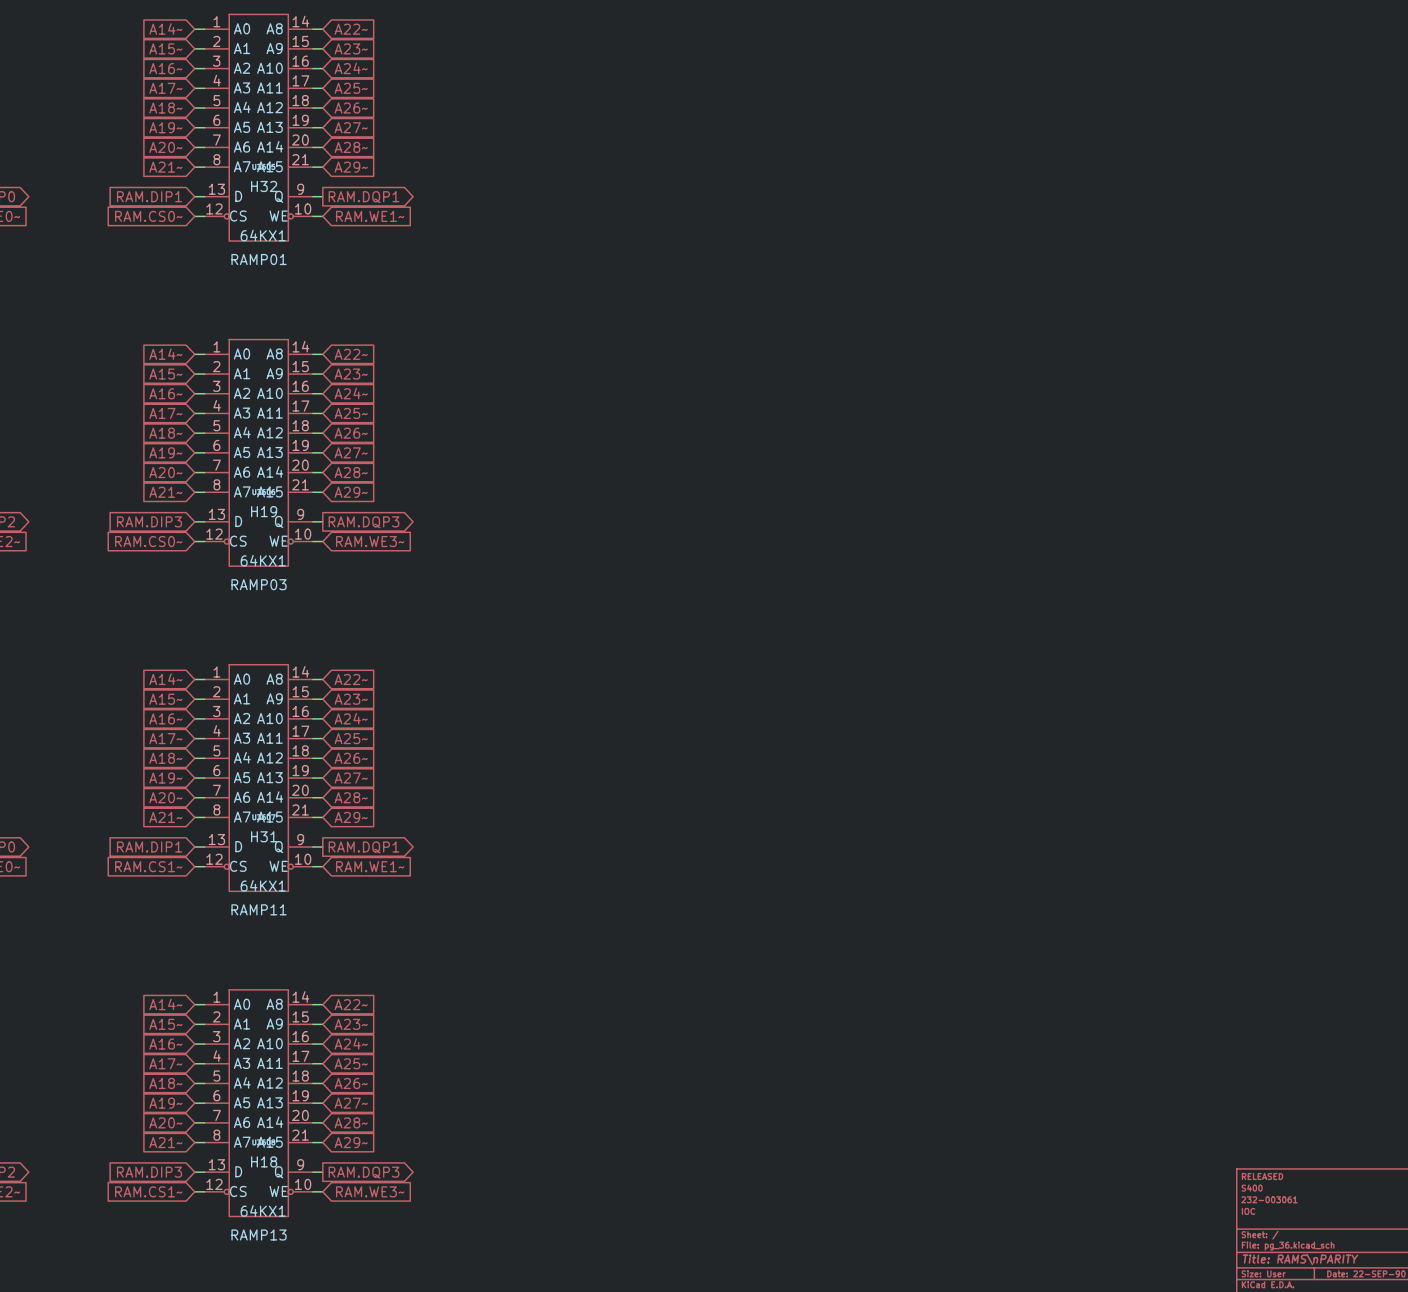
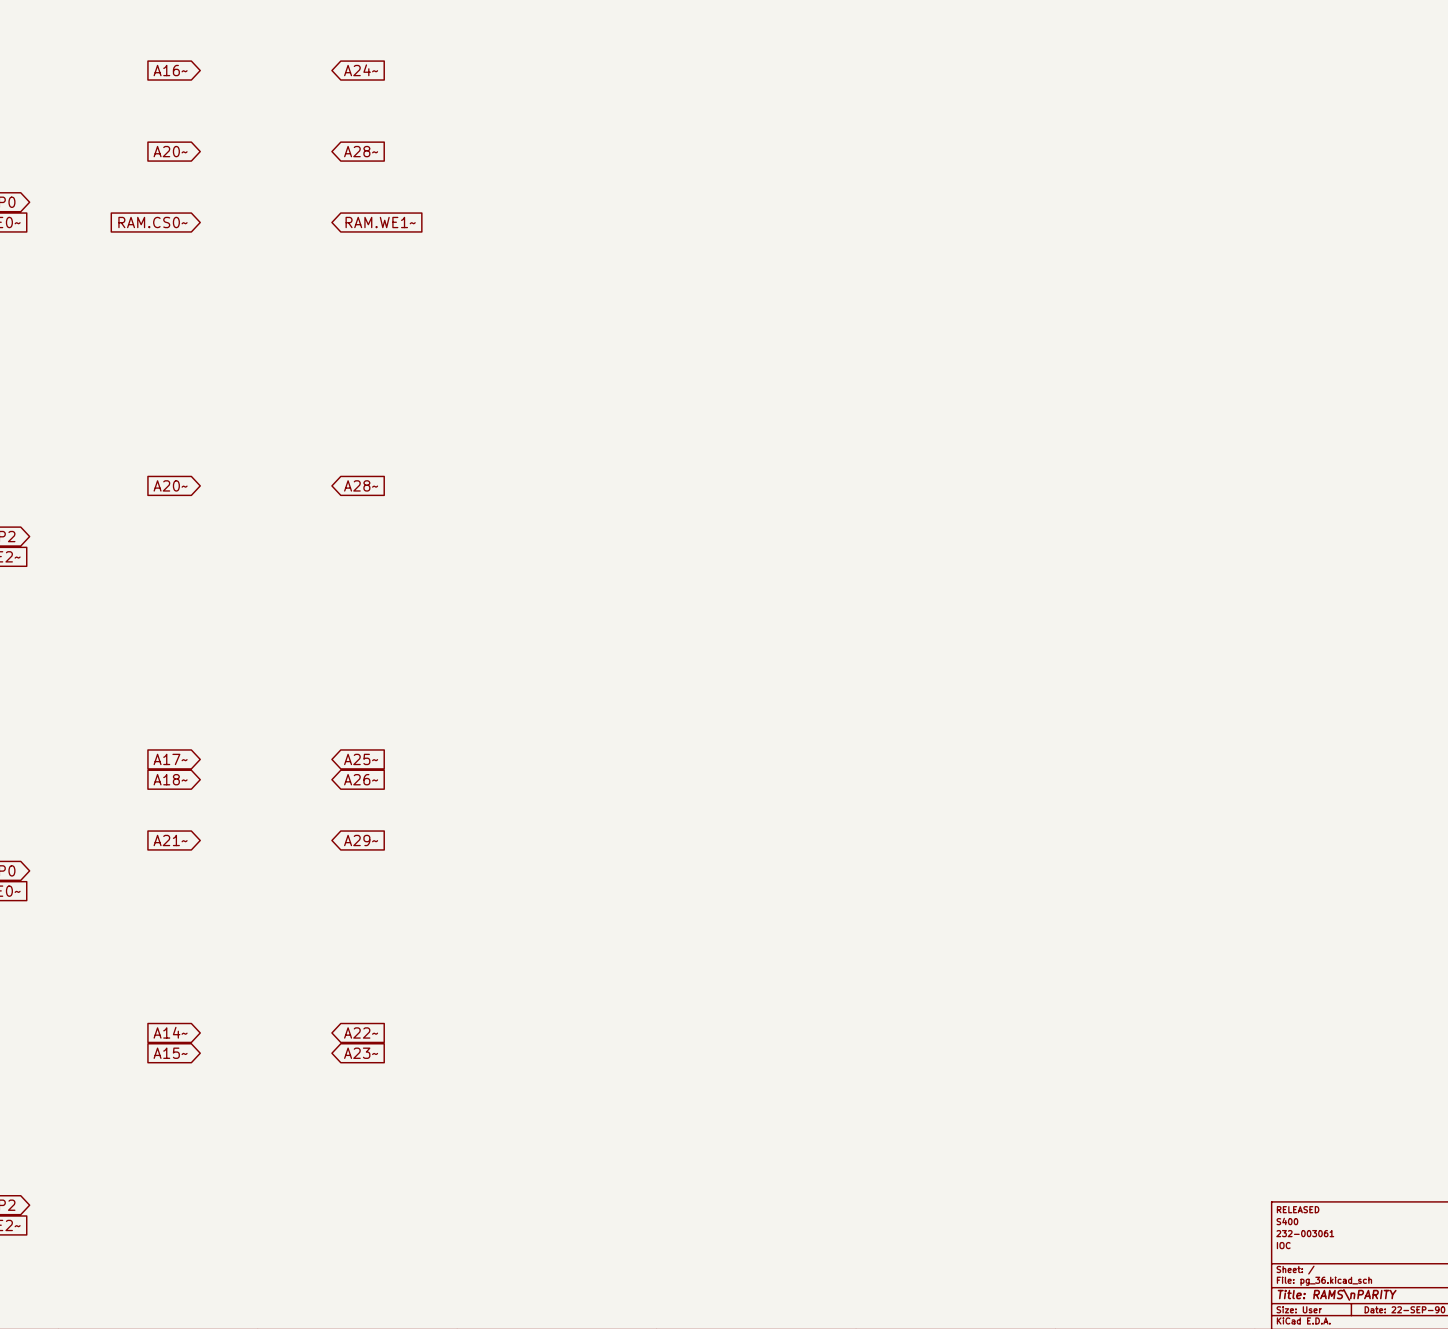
global label: A14~ (165, 28) -> none
wire: (194, 29) (204, 29) -> none
wire: (312, 29) (322, 29) -> none
global label: A22~ (351, 29) -> none
global label: A15~ (165, 48) -> none
wire: (194, 48) (204, 48) -> none
wire: (312, 48) (322, 48) -> none
global label: A23~ (351, 48) -> none
wire: (194, 68) (204, 68) -> none
wire: (312, 68) (322, 68) -> none
global label: A17~ (165, 88) -> none
wire: (194, 88) (204, 88) -> none
wire: (312, 88) (322, 88) -> none
global label: A25~ (351, 88) -> none
global label: A18~ (165, 108) -> none
wire: (194, 108) (204, 108) -> none
wire: (312, 108) (322, 108) -> none
global label: A26~ (351, 108) -> none
global label: A19~ (165, 127) -> none
wire: (194, 127) (204, 127) -> none
part: 64KX1 (258, 127) -> none
wire: (312, 127) (322, 127) -> none
global label: A27~ (351, 127) -> none
wire: (194, 147) (204, 147) -> none
wire: (312, 147) (322, 147) -> none
global label: A21~ (165, 167) -> none
wire: (194, 167) (204, 167) -> none
wire: (312, 167) (322, 167) -> none
global label: A29~ (351, 167) -> none
global label: RAM.DIP1 (149, 196) -> none
wire: (194, 196) (204, 196) -> none
wire: (312, 196) (322, 196) -> none
global label: RAM.DQP1 (363, 197) -> none
wire: (194, 216) (204, 216) -> none
wire: (312, 216) (322, 216) -> none
global label: A14~ (165, 354) -> none
wire: (194, 354) (204, 354) -> none
wire: (312, 354) (322, 354) -> none
global label: A22~ (351, 354) -> none
global label: A15~ (165, 374) -> none
wire: (194, 374) (204, 374) -> none
wire: (312, 374) (322, 374) -> none
global label: A23~ (351, 374) -> none
global label: A16~ (165, 393) -> none
wire: (194, 393) (204, 393) -> none
wire: (312, 393) (322, 393) -> none
global label: A24~ (351, 393) -> none
global label: A17~ (165, 413) -> none
wire: (194, 413) (204, 413) -> none
wire: (312, 413) (322, 413) -> none
global label: A25~ (351, 413) -> none
global label: A18~ (165, 433) -> none
wire: (194, 433) (204, 433) -> none
wire: (312, 433) (322, 433) -> none
global label: A26~ (351, 433) -> none
global label: A19~ (165, 452) -> none
wire: (194, 452) (204, 452) -> none
part: 64KX1 (258, 452) -> none
wire: (312, 452) (322, 452) -> none
global label: A27~ (351, 452) -> none
wire: (194, 472) (204, 472) -> none
wire: (312, 472) (322, 472) -> none
global label: A21~ (165, 492) -> none
wire: (194, 492) (204, 492) -> none
wire: (312, 492) (322, 492) -> none
global label: A29~ (351, 492) -> none
global label: RAM.DIP3 (149, 521) -> none
wire: (194, 521) (204, 521) -> none
wire: (312, 521) (322, 521) -> none
global label: RAM.DQP3 (363, 522) -> none
global label: RAM.CS0~ (148, 541) -> none
wire: (194, 541) (204, 541) -> none
wire: (312, 541) (322, 541) -> none
global label: RAM.WE3~ (370, 541) -> none
global label: A14~ (165, 679) -> none
wire: (194, 679) (204, 679) -> none
wire: (312, 679) (322, 679) -> none
global label: A22~ (351, 679) -> none
global label: A15~ (165, 699) -> none
wire: (194, 699) (204, 699) -> none
wire: (312, 699) (322, 699) -> none
global label: A23~ (351, 699) -> none
global label: A16~ (165, 718) -> none
wire: (194, 718) (204, 718) -> none
wire: (312, 718) (322, 718) -> none
global label: A24~ (351, 718) -> none
wire: (194, 738) (204, 738) -> none
wire: (312, 738) (322, 738) -> none
wire: (194, 758) (204, 758) -> none
wire: (312, 758) (322, 758) -> none
global label: A19~ (165, 778) -> none
wire: (194, 778) (204, 778) -> none
part: 64KX1 (258, 778) -> none
wire: (312, 778) (322, 778) -> none
global label: A27~ (351, 778) -> none
global label: A20~ (165, 797) -> none
wire: (194, 797) (204, 797) -> none
wire: (312, 797) (322, 797) -> none
global label: A28~ (351, 797) -> none
wire: (194, 817) (204, 817) -> none
wire: (312, 817) (322, 817) -> none
global label: RAM.DIP1 (149, 847) -> none
wire: (194, 847) (204, 847) -> none
wire: (312, 847) (322, 847) -> none
global label: RAM.DQP1 (363, 847) -> none
global label: RAM.CS1~ (148, 866) -> none
wire: (194, 866) (204, 866) -> none
wire: (312, 866) (322, 866) -> none
global label: RAM.WE1~ (370, 866) -> none
wire: (194, 1004) (204, 1004) -> none
wire: (312, 1004) (322, 1004) -> none
wire: (194, 1024) (204, 1024) -> none
wire: (312, 1024) (322, 1024) -> none
global label: A24~ (351, 1043) -> none
global label: A16~ (165, 1044) -> none
wire: (194, 1044) (204, 1044) -> none
wire: (312, 1044) (322, 1044) -> none
global label: A17~ (165, 1063) -> none
wire: (194, 1063) (204, 1063) -> none
wire: (312, 1063) (322, 1063) -> none
global label: A25~ (351, 1063) -> none
global label: A18~ (165, 1083) -> none
wire: (194, 1083) (204, 1083) -> none
wire: (312, 1083) (322, 1083) -> none
global label: A26~ (351, 1083) -> none
global label: A19~ (165, 1103) -> none
wire: (194, 1103) (204, 1103) -> none
part: 64KX1 (258, 1103) -> none
wire: (312, 1103) (322, 1103) -> none
global label: A27~ (351, 1103) -> none
global label: A20~ (165, 1122) -> none
wire: (194, 1122) (204, 1122) -> none
wire: (312, 1122) (322, 1122) -> none
global label: A28~ (351, 1122) -> none
global label: A21~ (165, 1142) -> none
wire: (194, 1142) (204, 1142) -> none
wire: (312, 1142) (322, 1142) -> none
global label: A29~ (351, 1142) -> none
global label: RAM.DIP3 (149, 1172) -> none
wire: (194, 1172) (204, 1172) -> none
wire: (312, 1172) (322, 1172) -> none
global label: RAM.DQP3 (363, 1172) -> none
global label: RAM.CS1~ (148, 1191) -> none
wire: (194, 1191) (204, 1191) -> none
wire: (312, 1191) (322, 1191) -> none
global label: RAM.WE3~ (370, 1191) -> none

